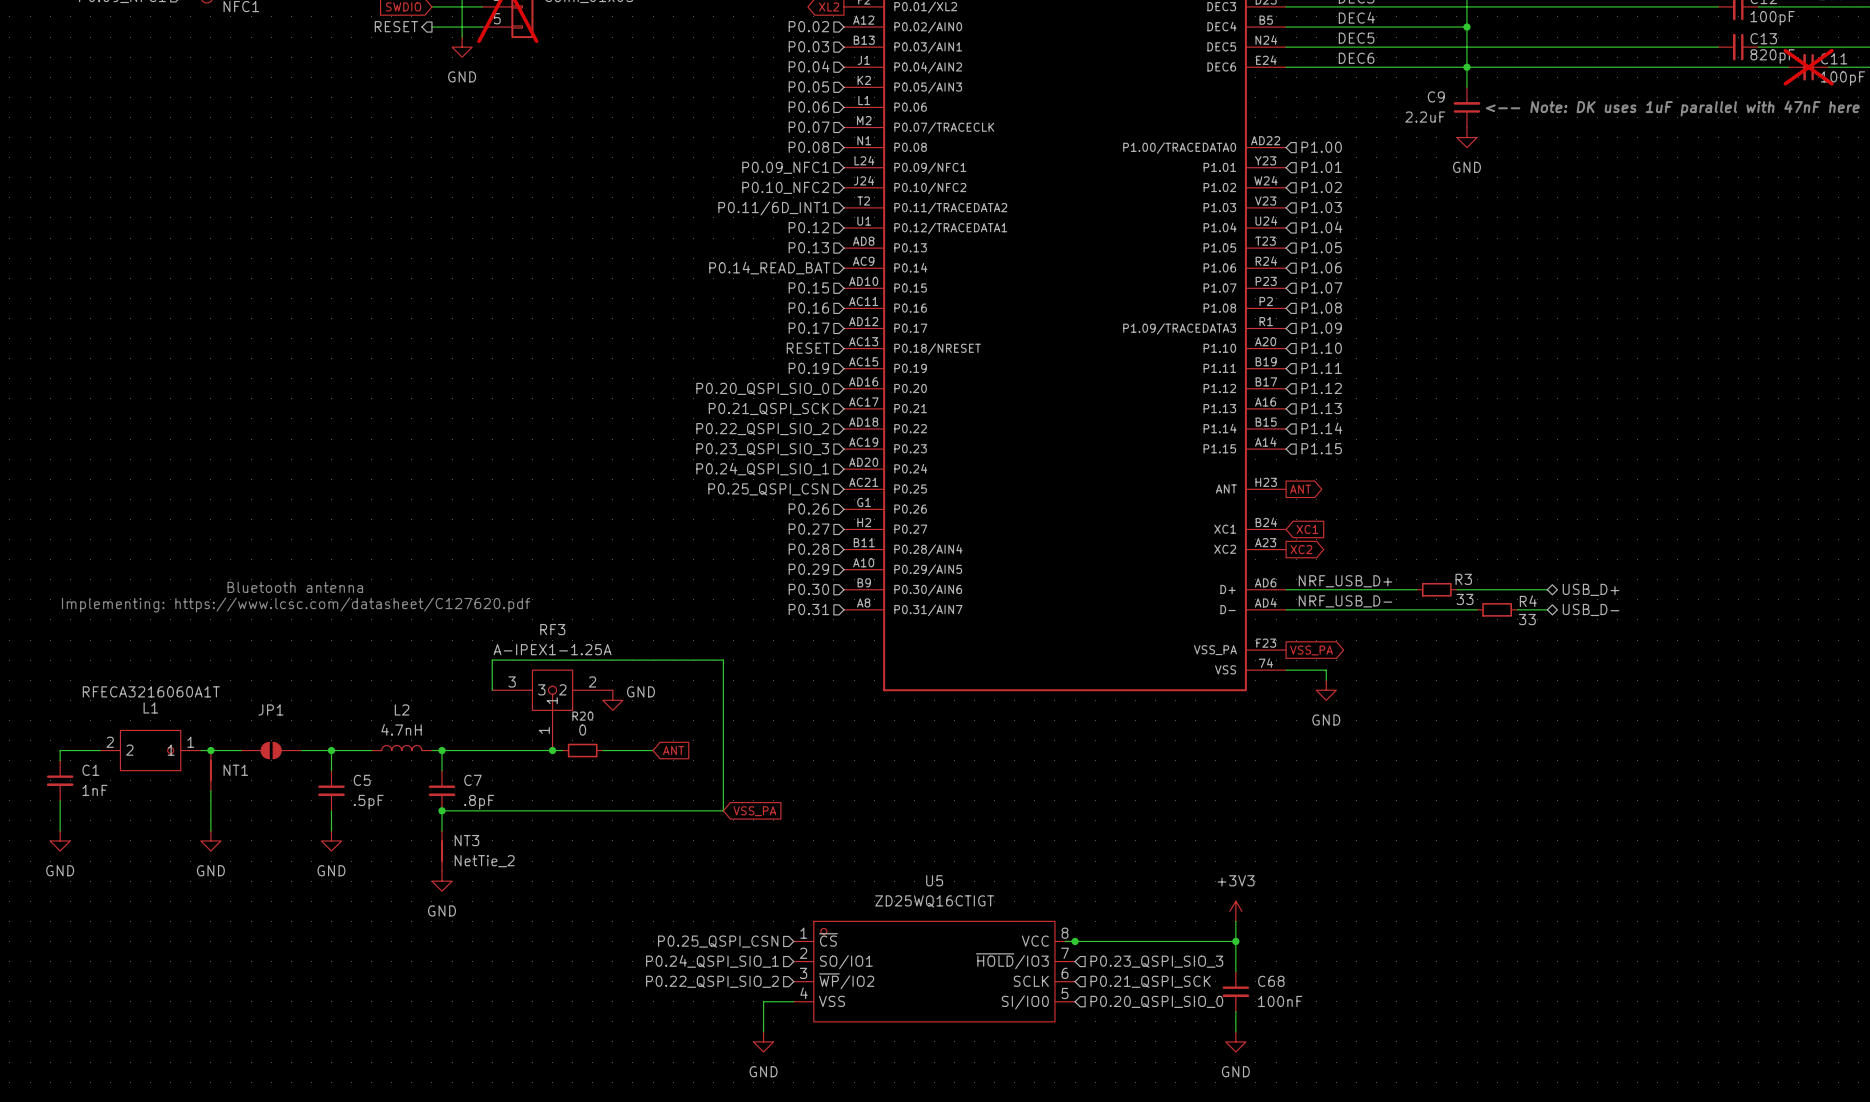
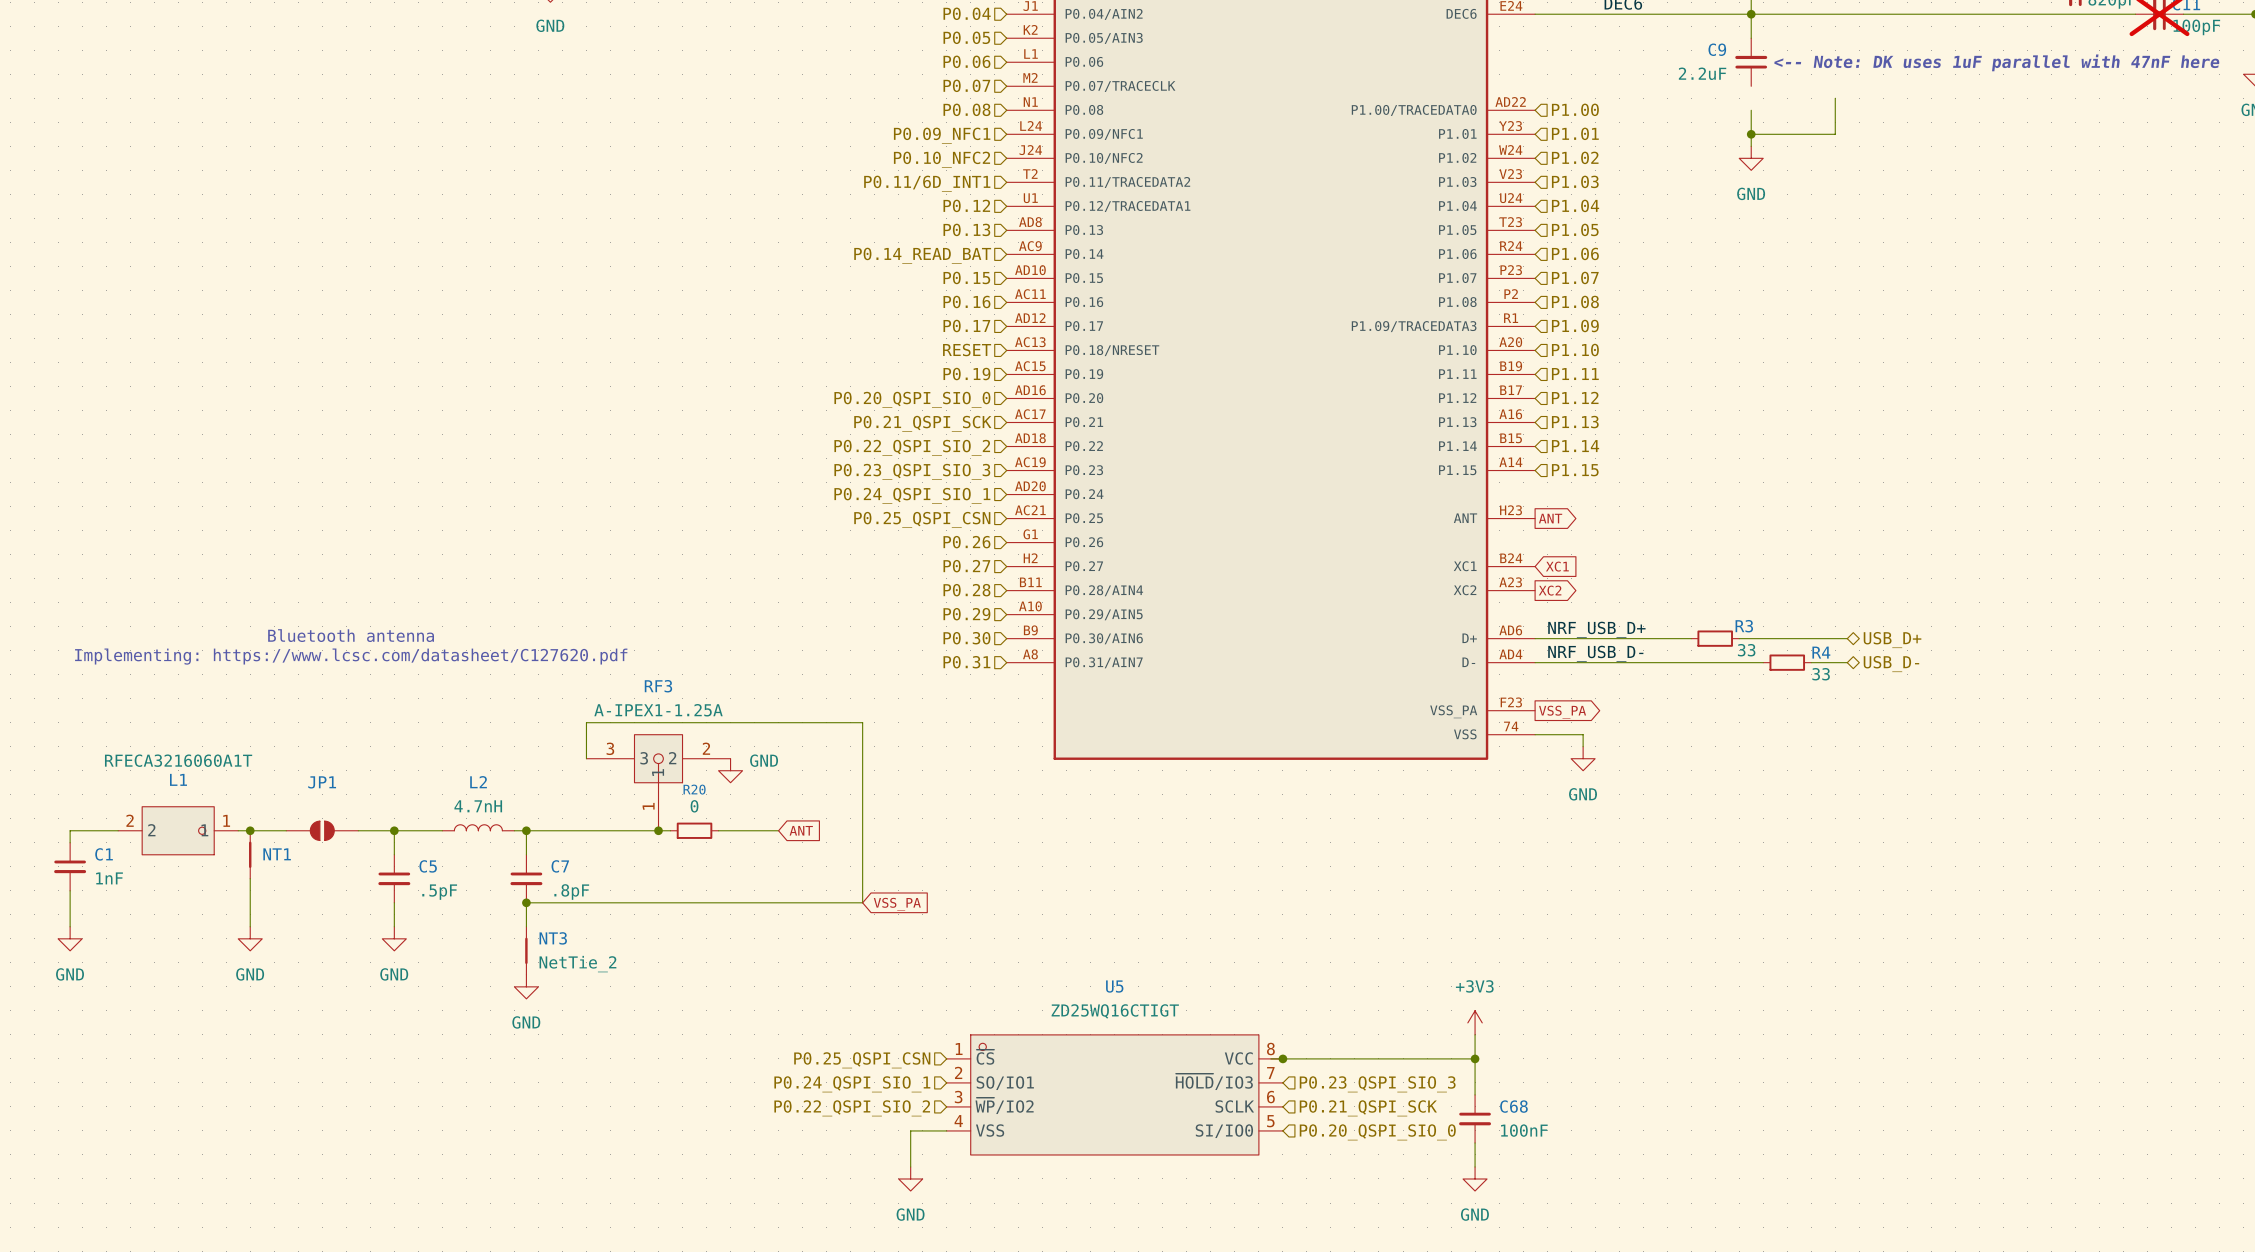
power symbol position: GND (1466, 137) -> GND (1751, 158)
wire: none -> (1835, 98) (1835, 134) (1751, 134)
wire: none -> (1751, 110) (1751, 146)
junction: none -> (1751, 134)

